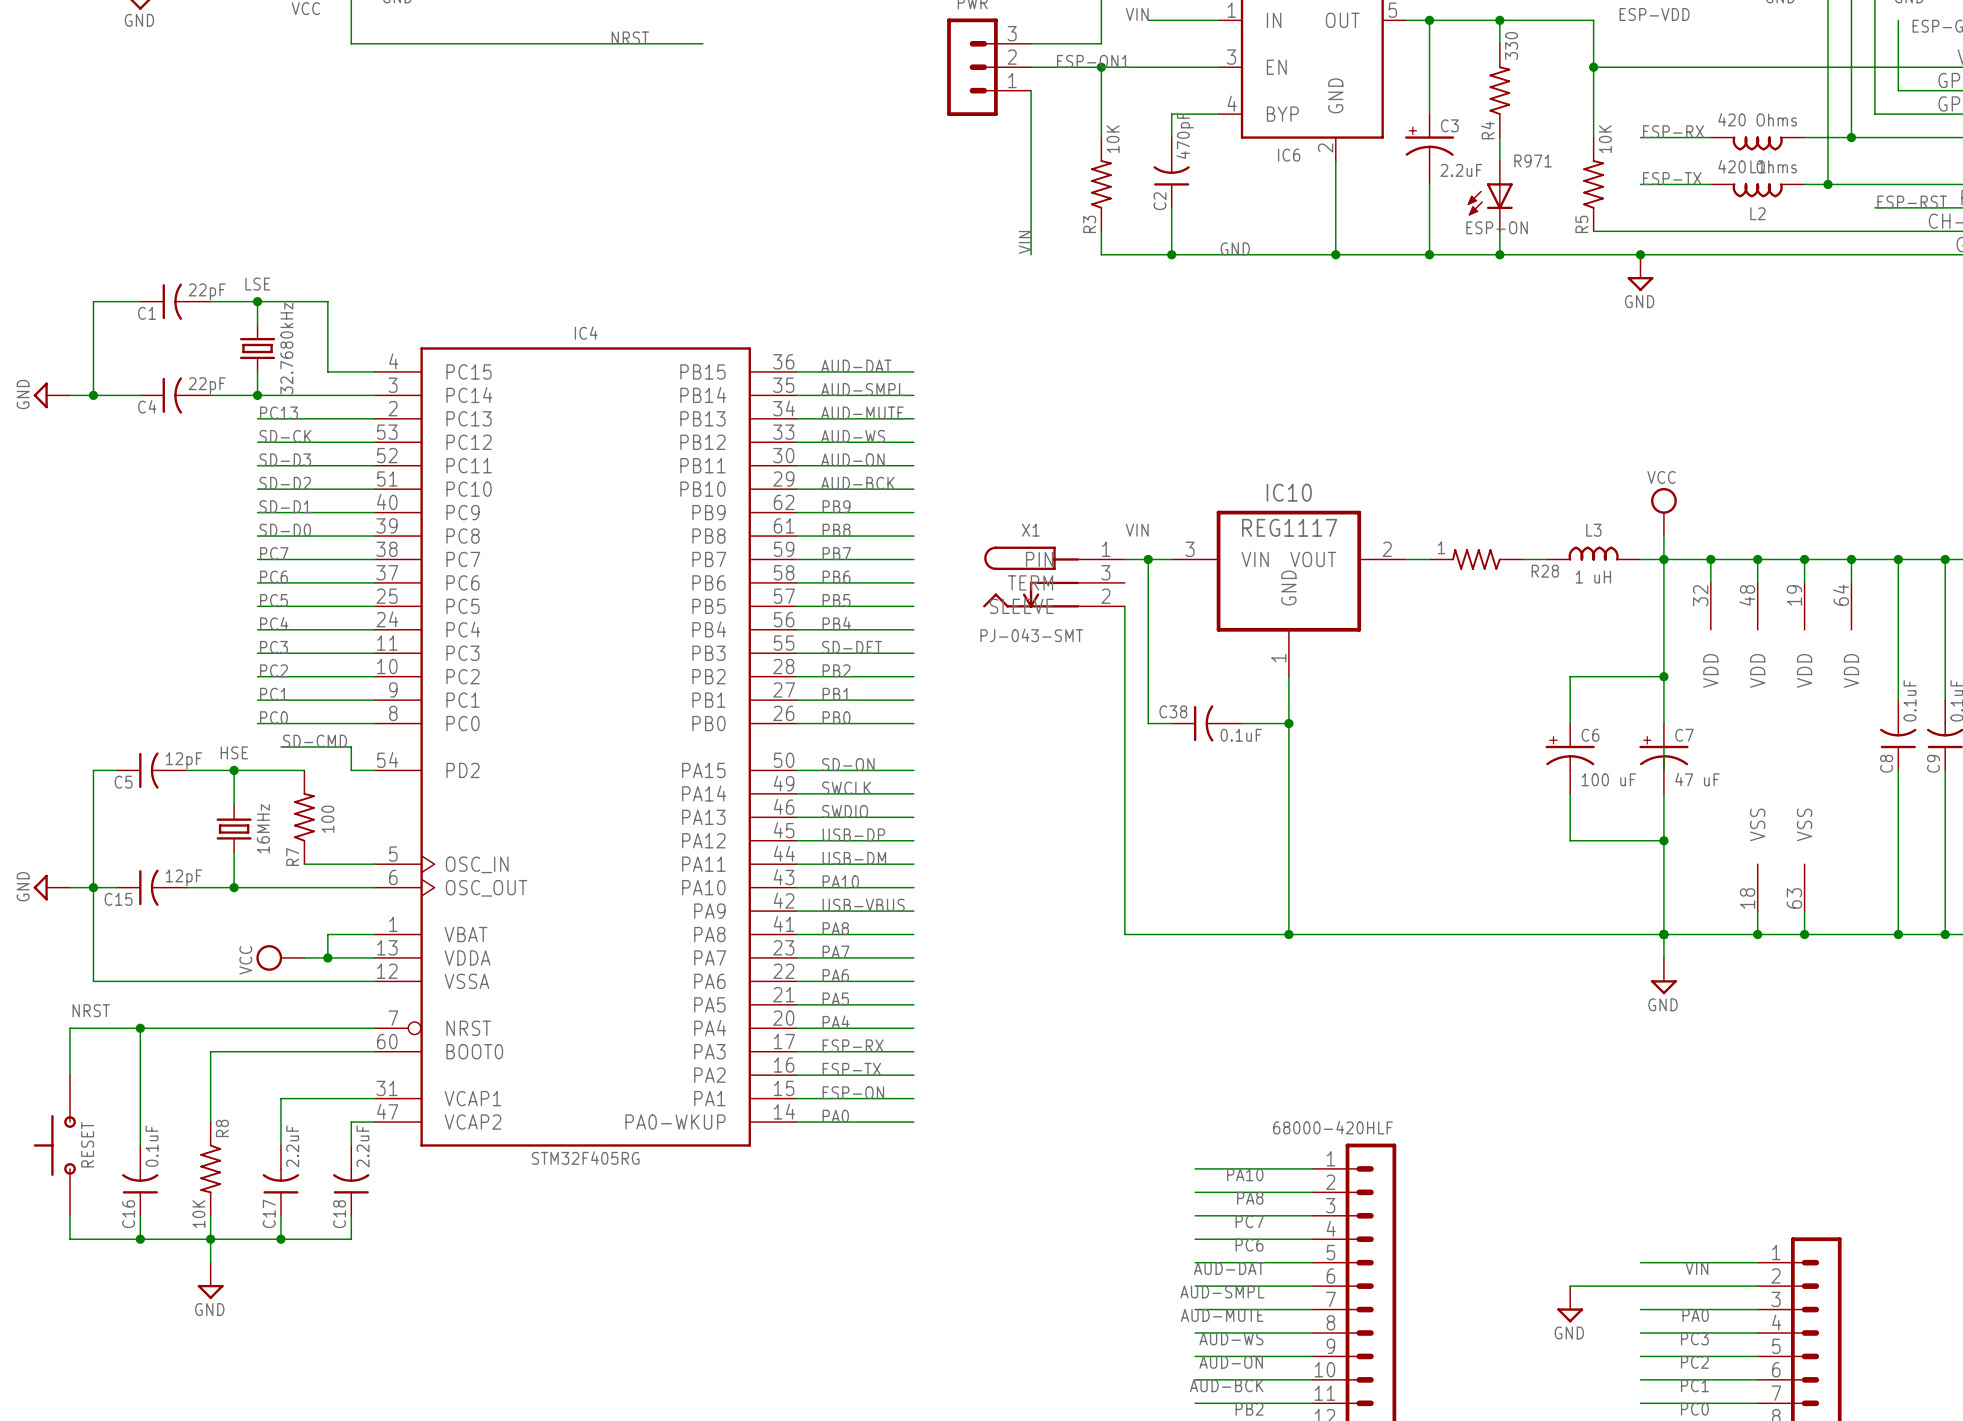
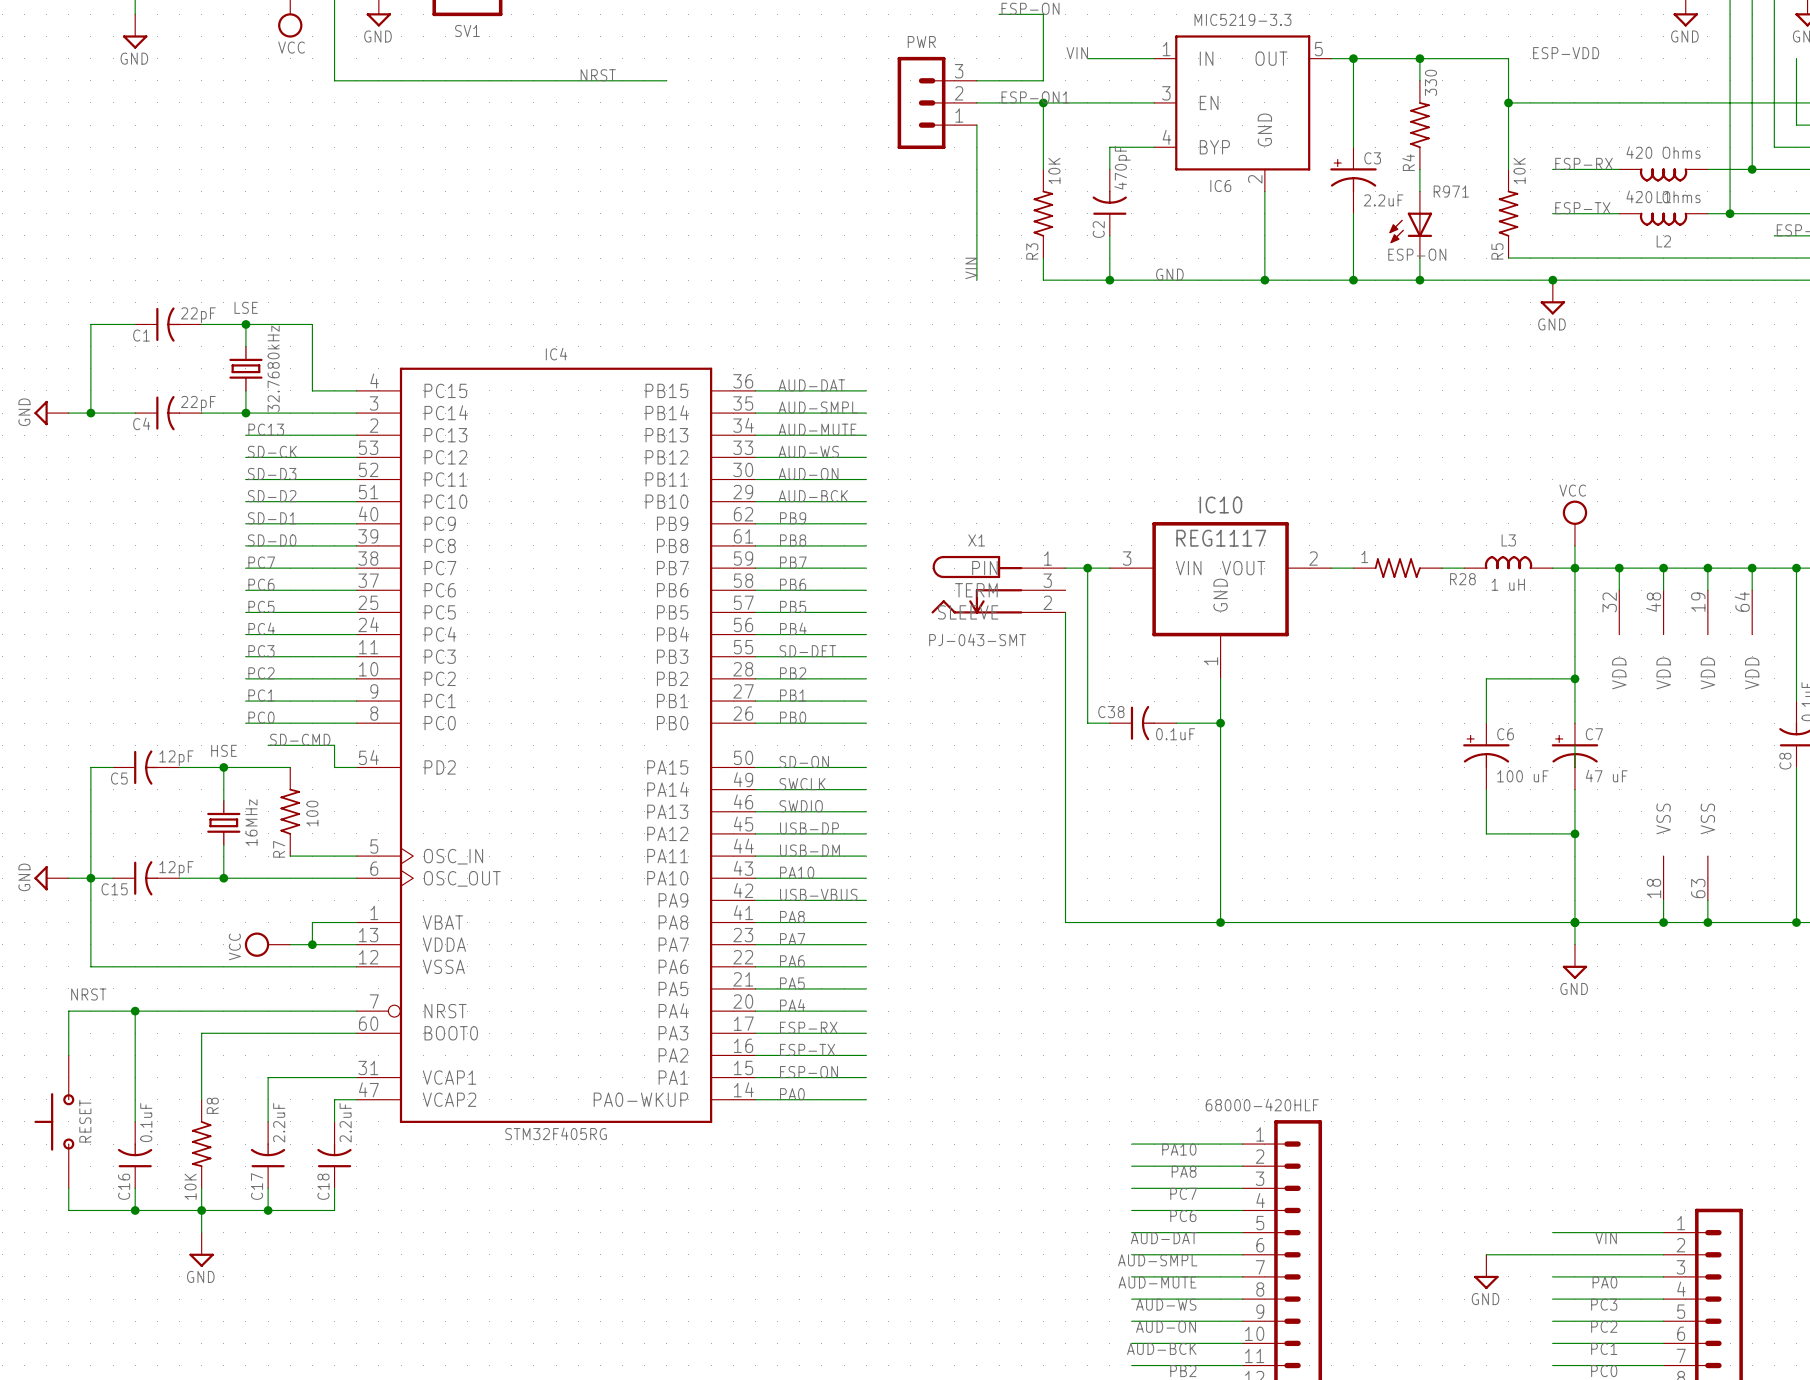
label: VIN (1137, 530) -> none

